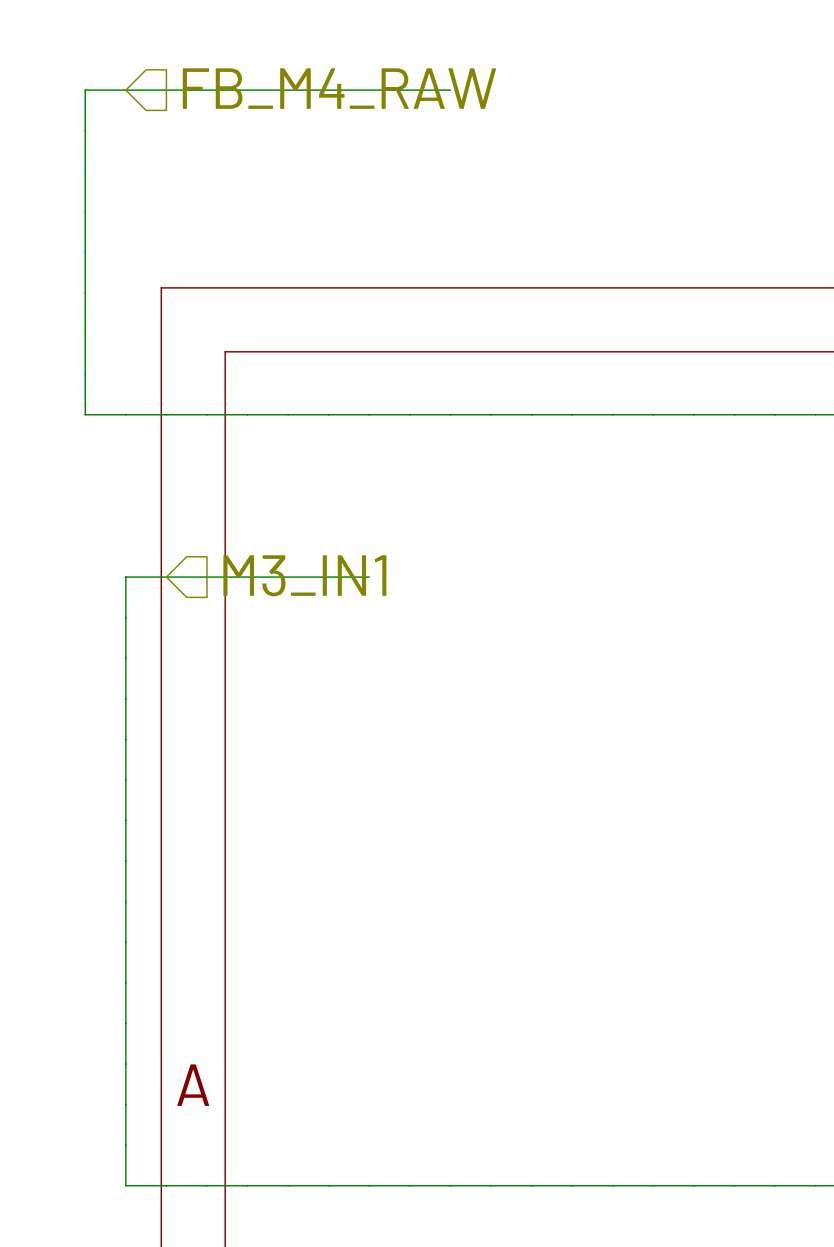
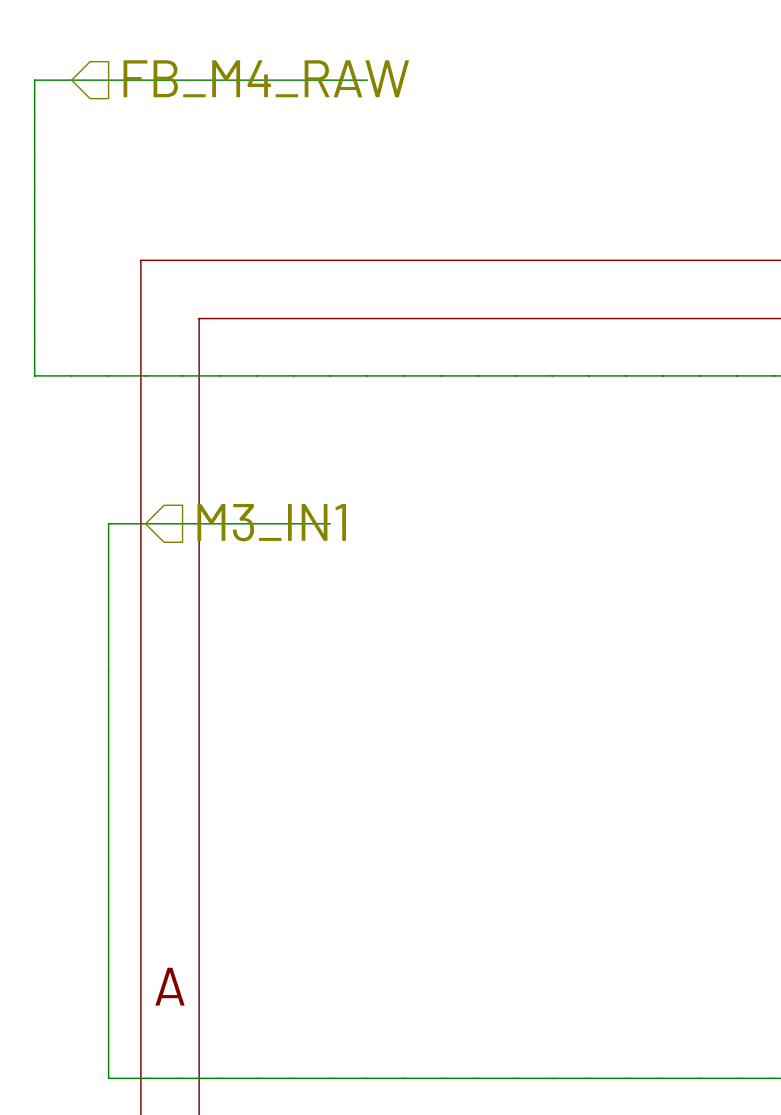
hierarchical label position: FB_M4_RAW (339, 88) -> FB_M4_RAW (266, 78)
wire: (85, 90) (85, 414) -> (71, 80) (34, 80) (34, 375) (71, 375)
wire: (409, 90) (450, 90) -> none

